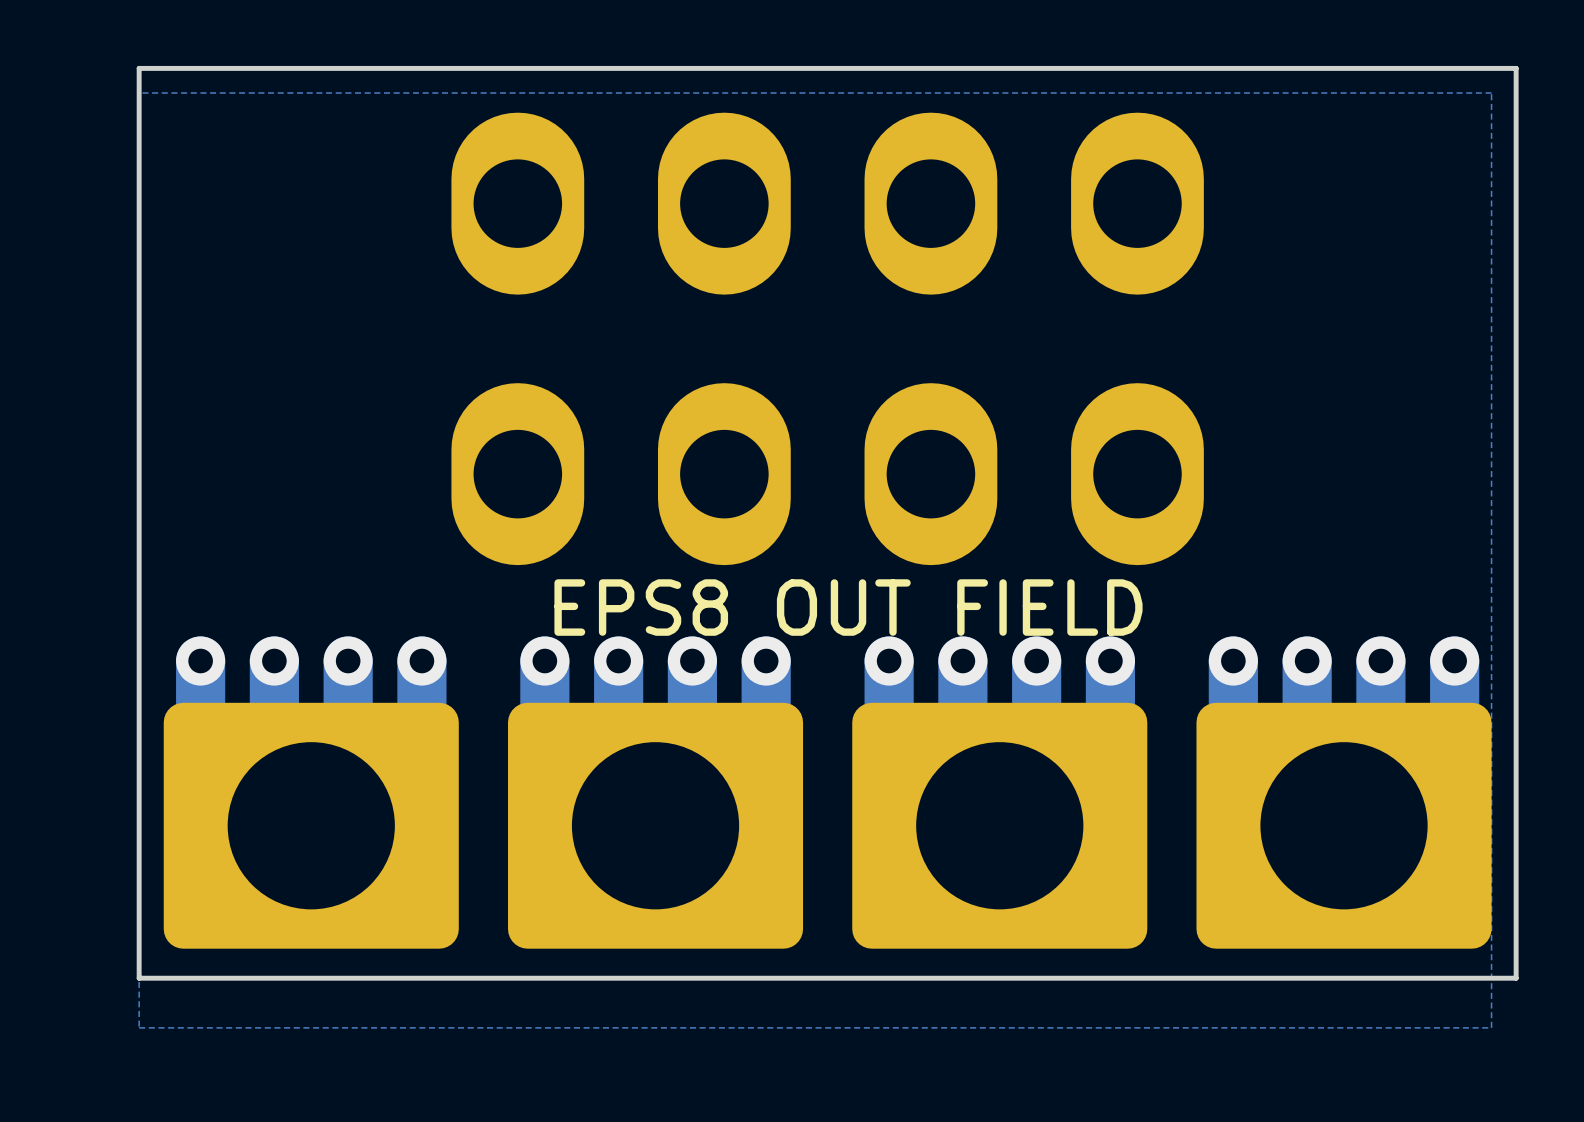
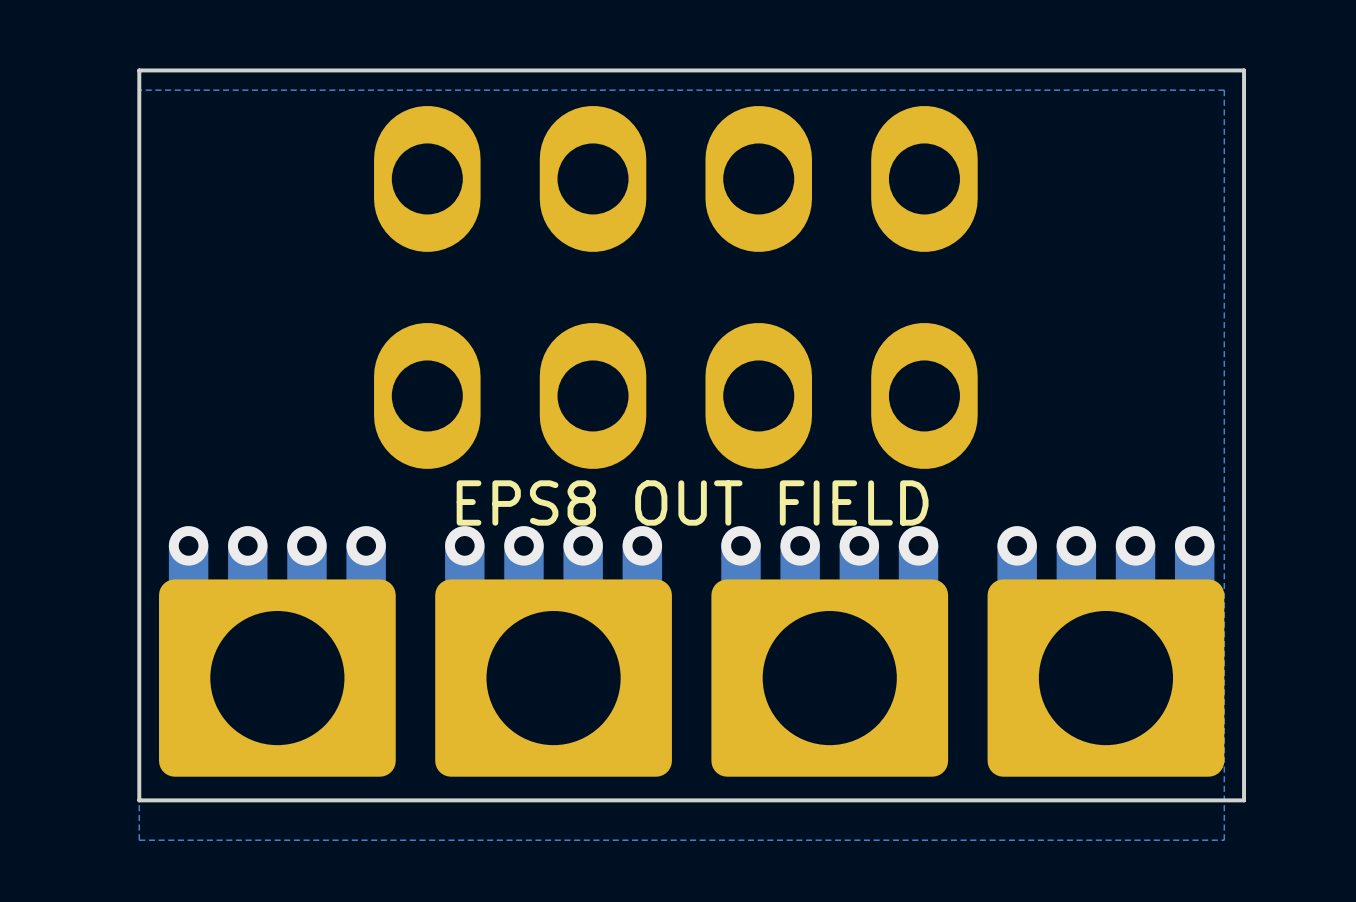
part position: (827, 338) -> (675, 287)

